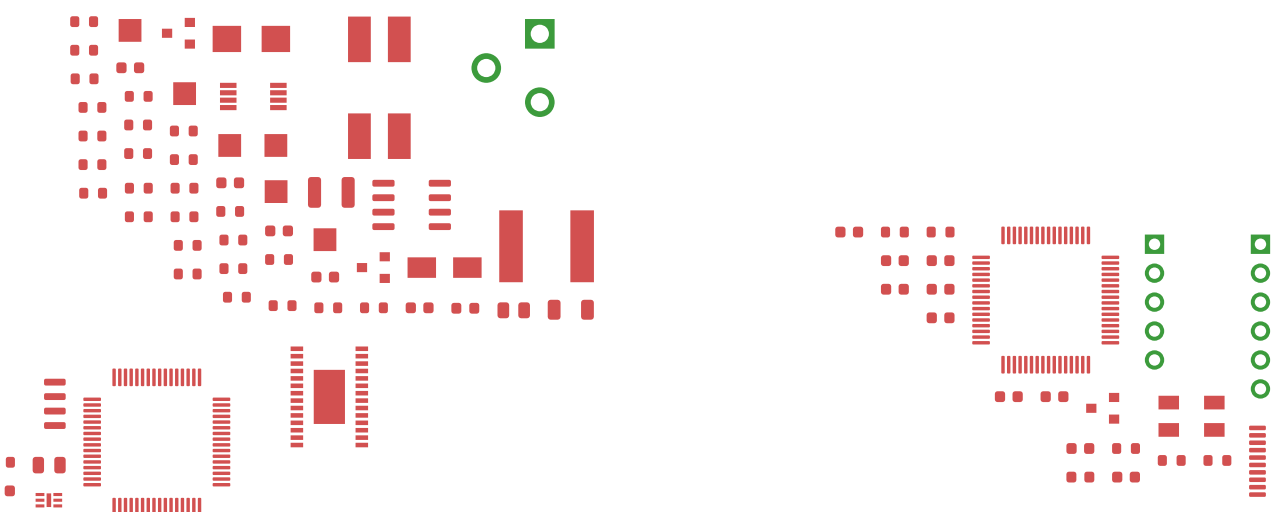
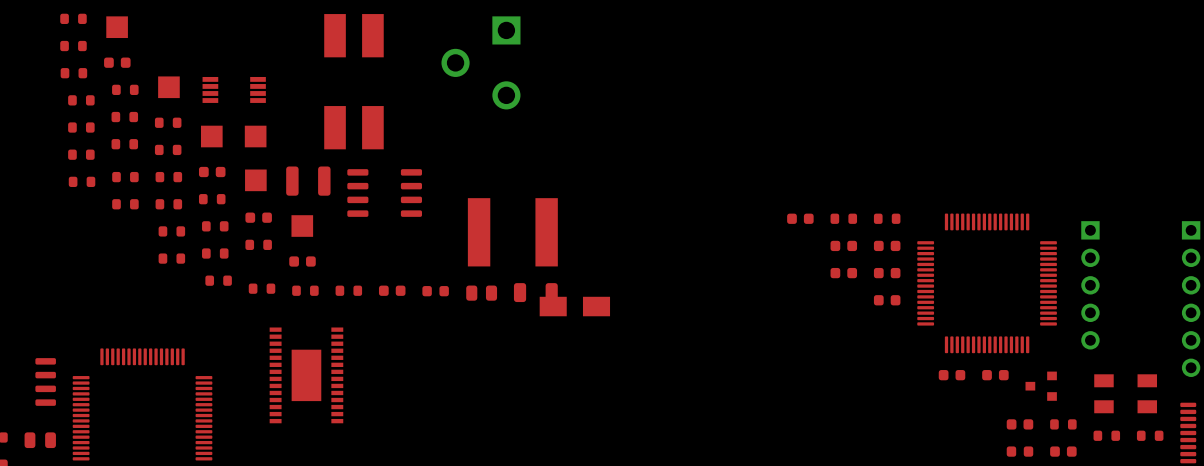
part: (178, 33) -> none
part: (251, 38) -> none
part: (373, 267) -> none
part position: (444, 267) -> (574, 306)

